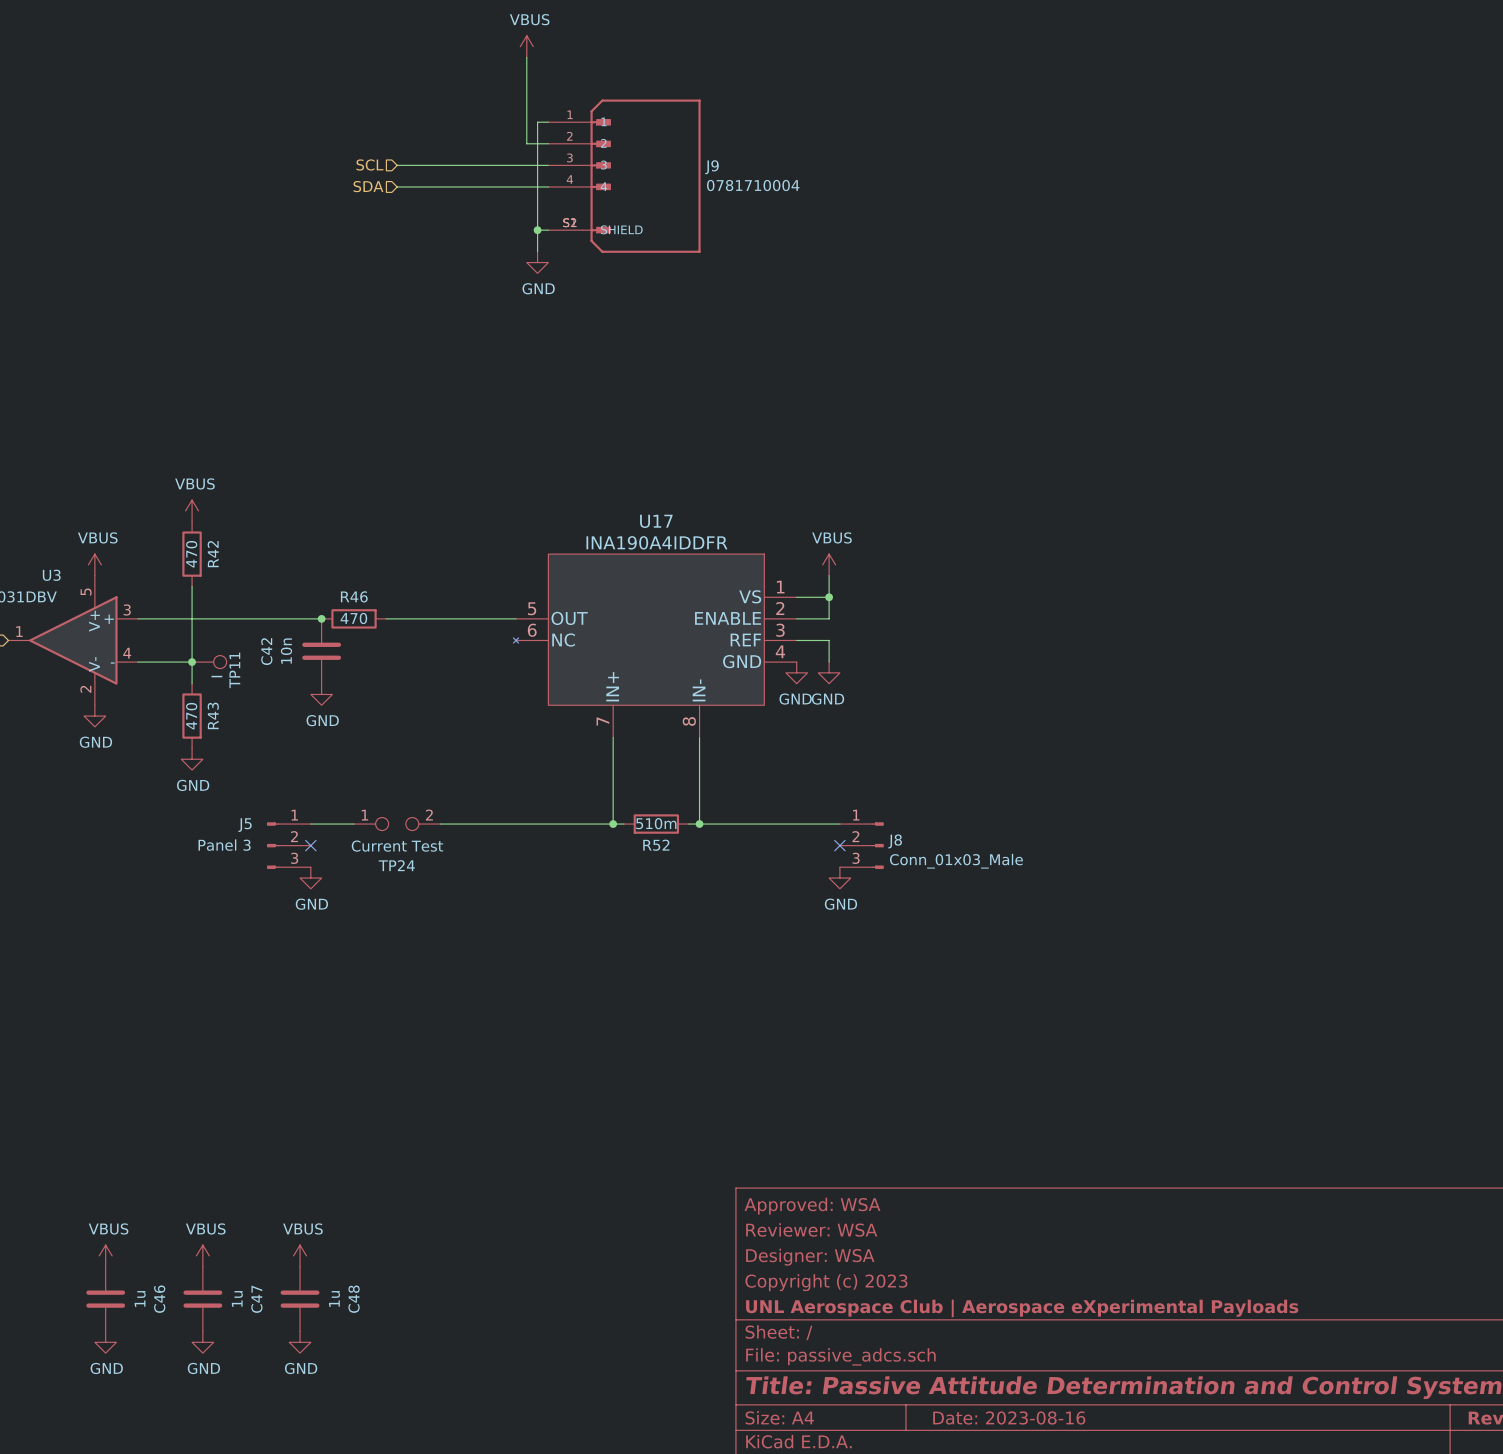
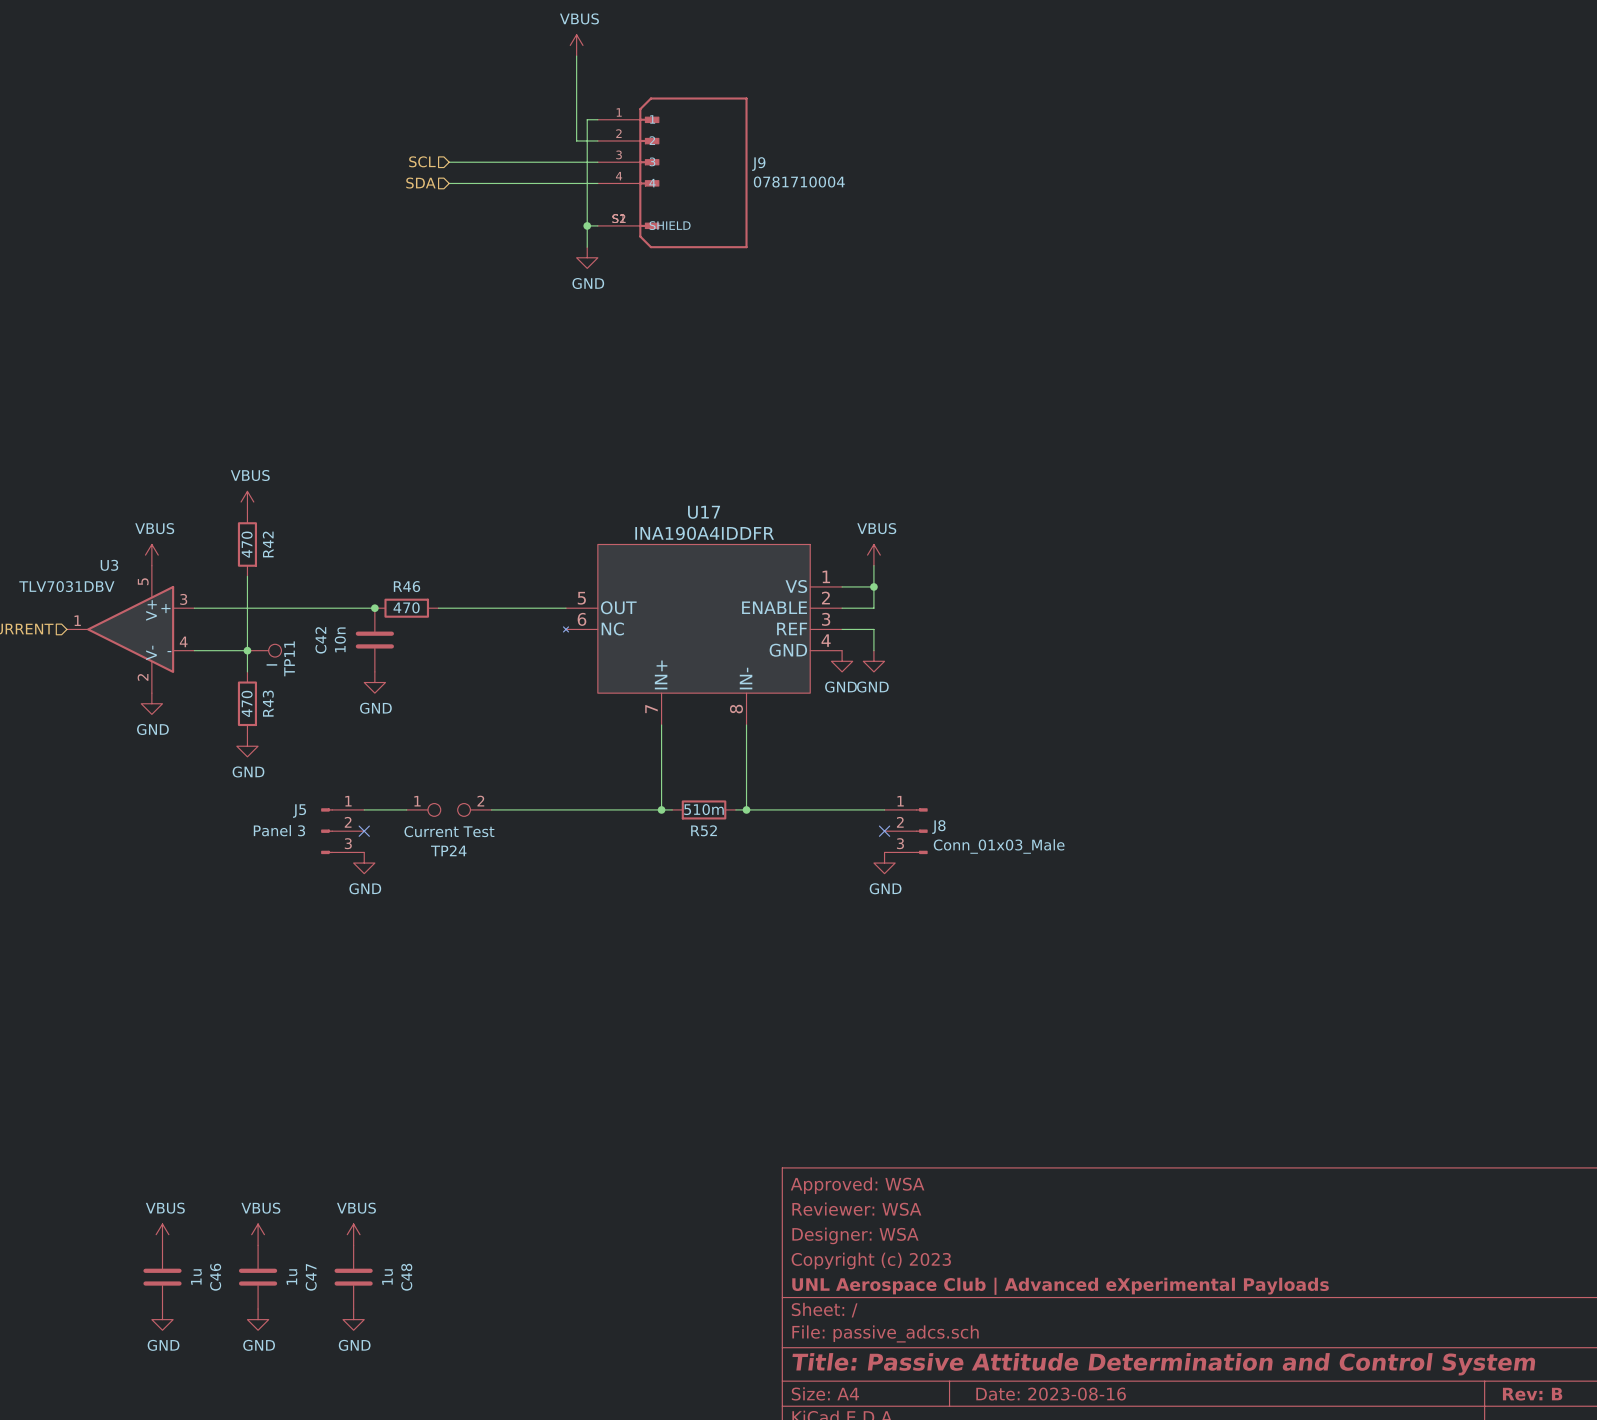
title block: UNL Aerospace Club | Aerospace eXperimental Payloads (1022, 1308) -> UNL Aerospace Club | Advanced eXperimental Payloads (1060, 1286)

